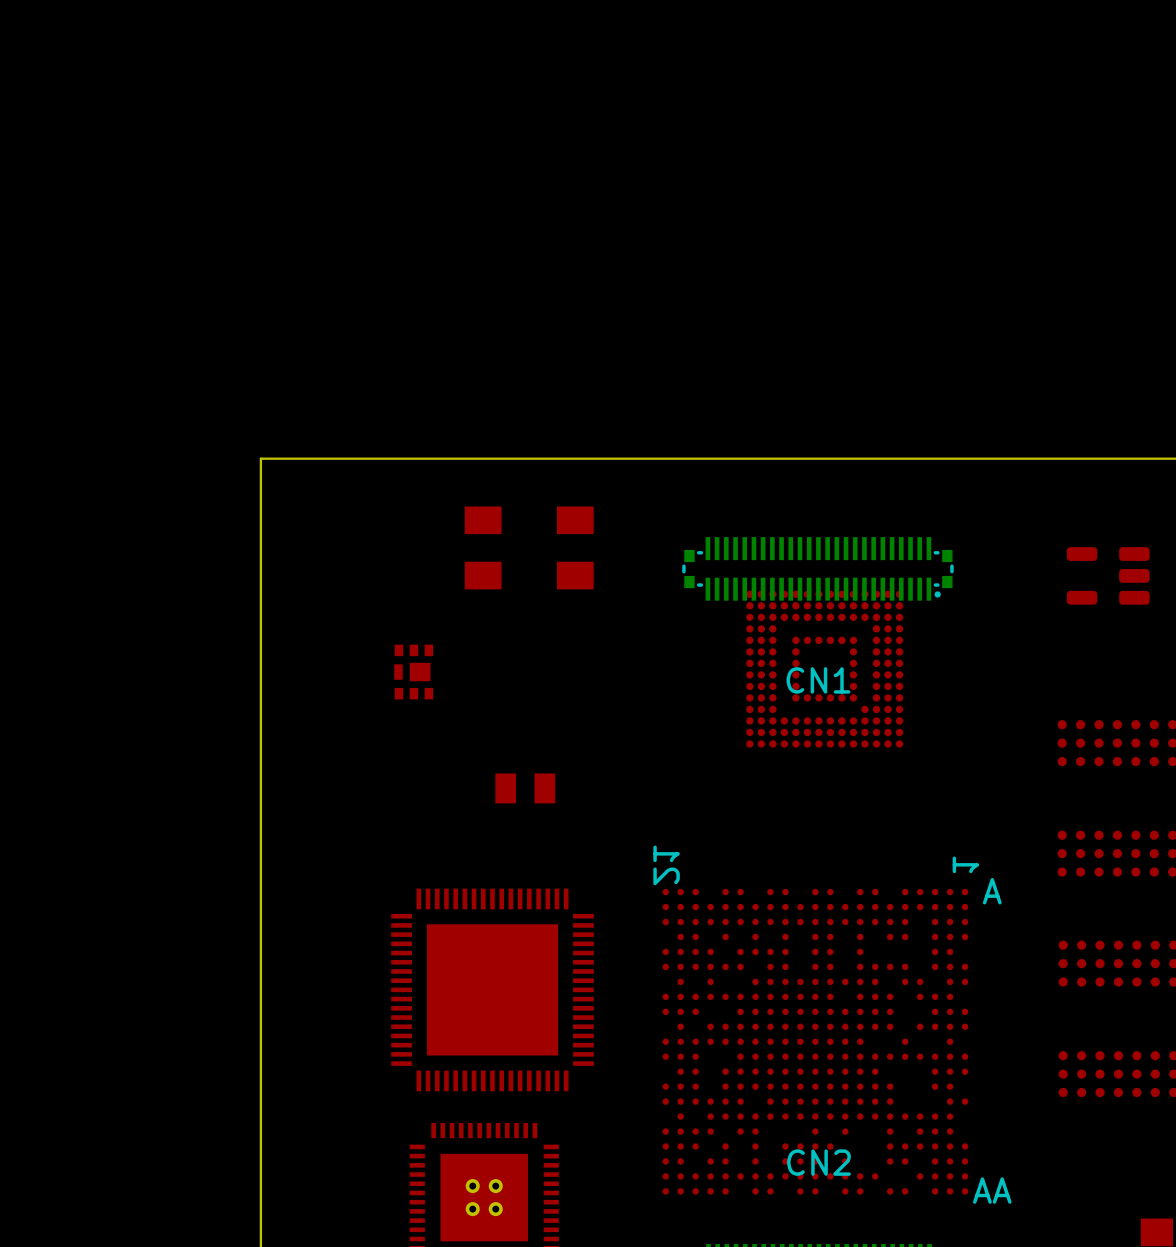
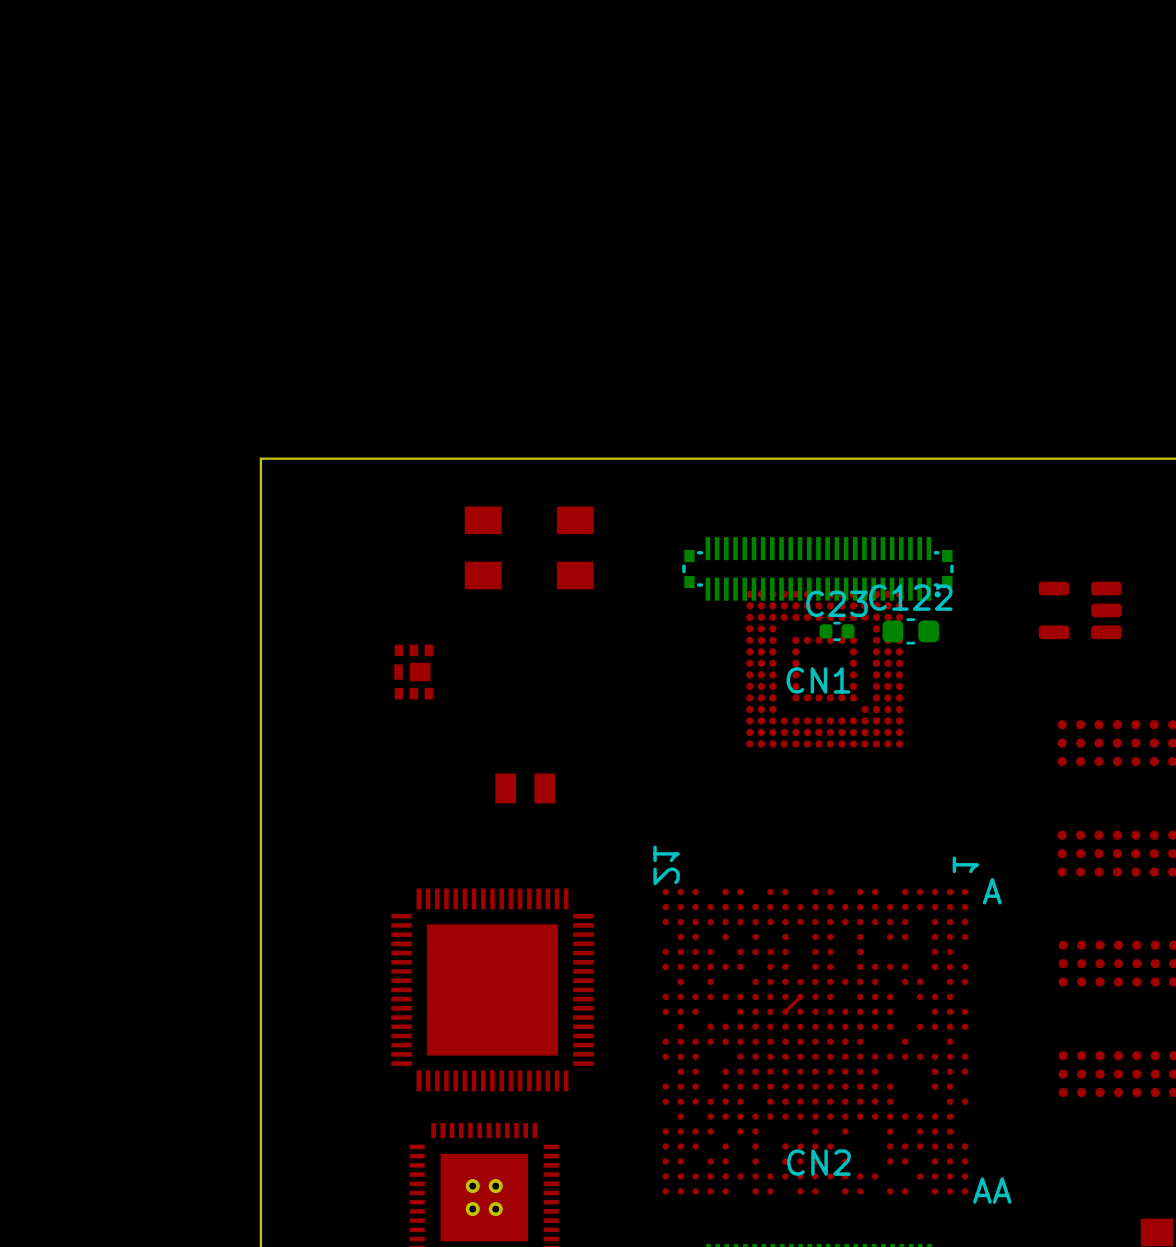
part position: (1108, 575) -> (1080, 610)
C23: none -> (837, 631)
C122: none -> (910, 631)
top track: none -> (800, 996) (785, 1011)

